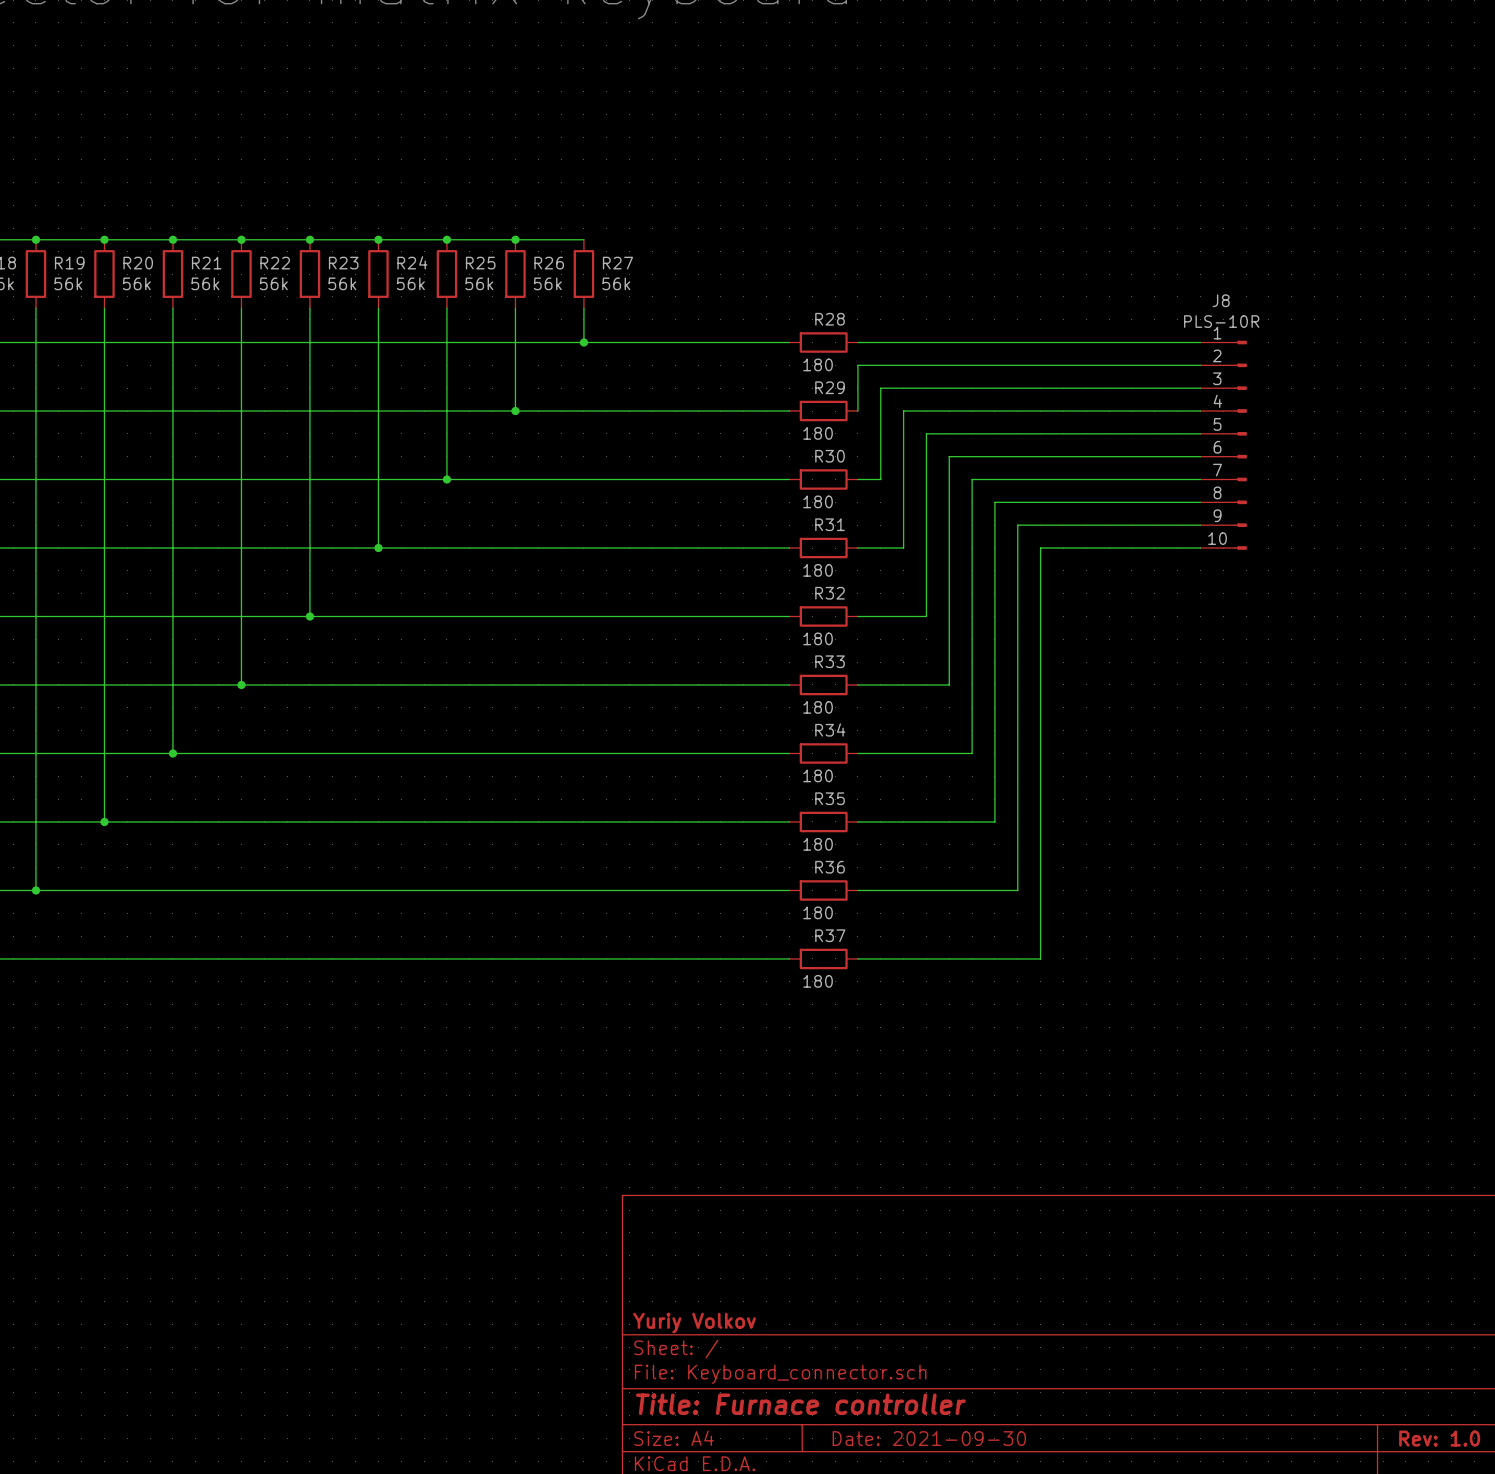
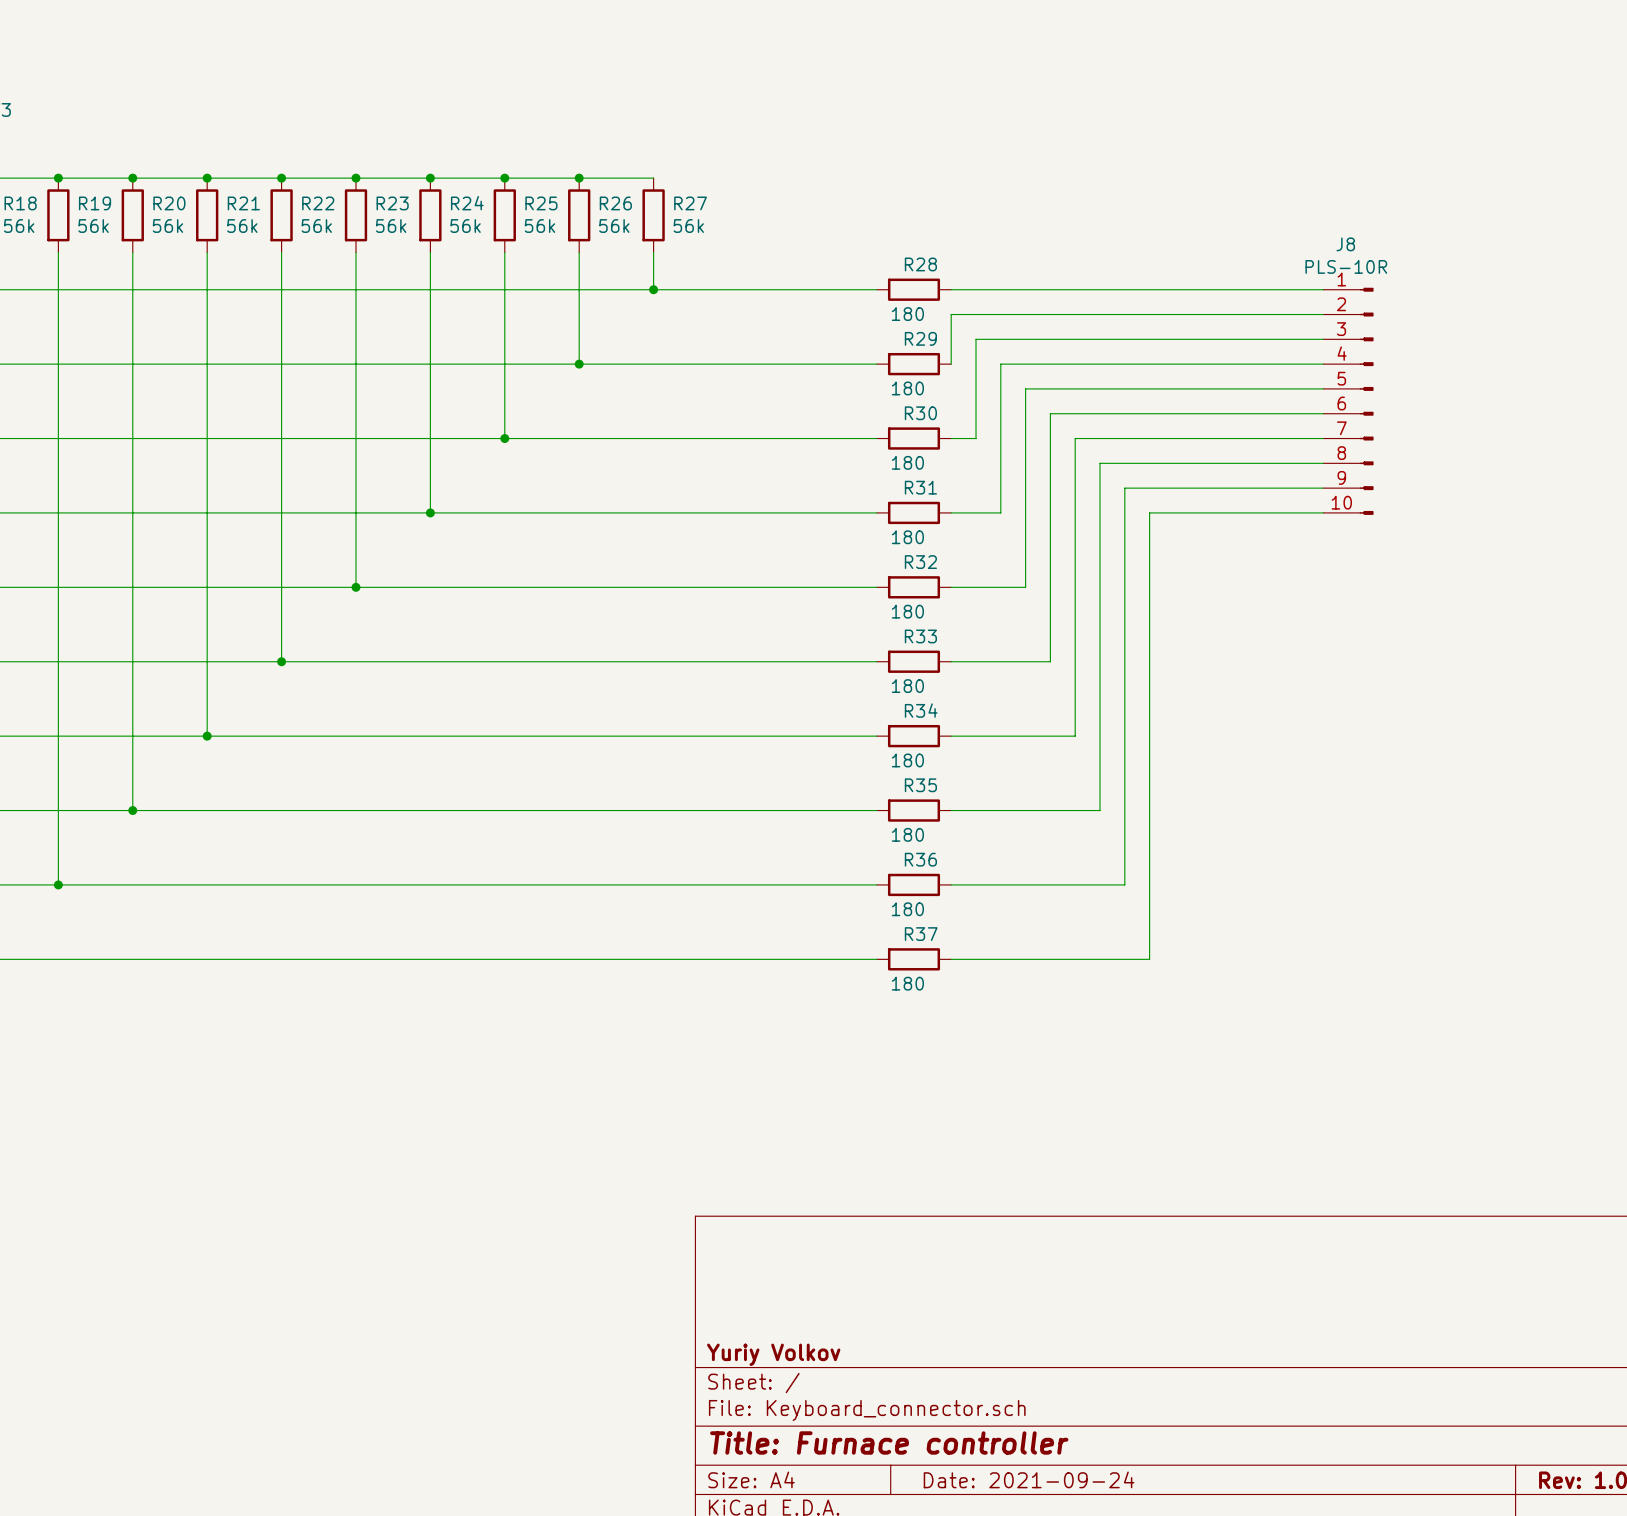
title block: Date: 2021-09-30 (929, 1438) -> Date: 2021-09-24 (1029, 1479)

